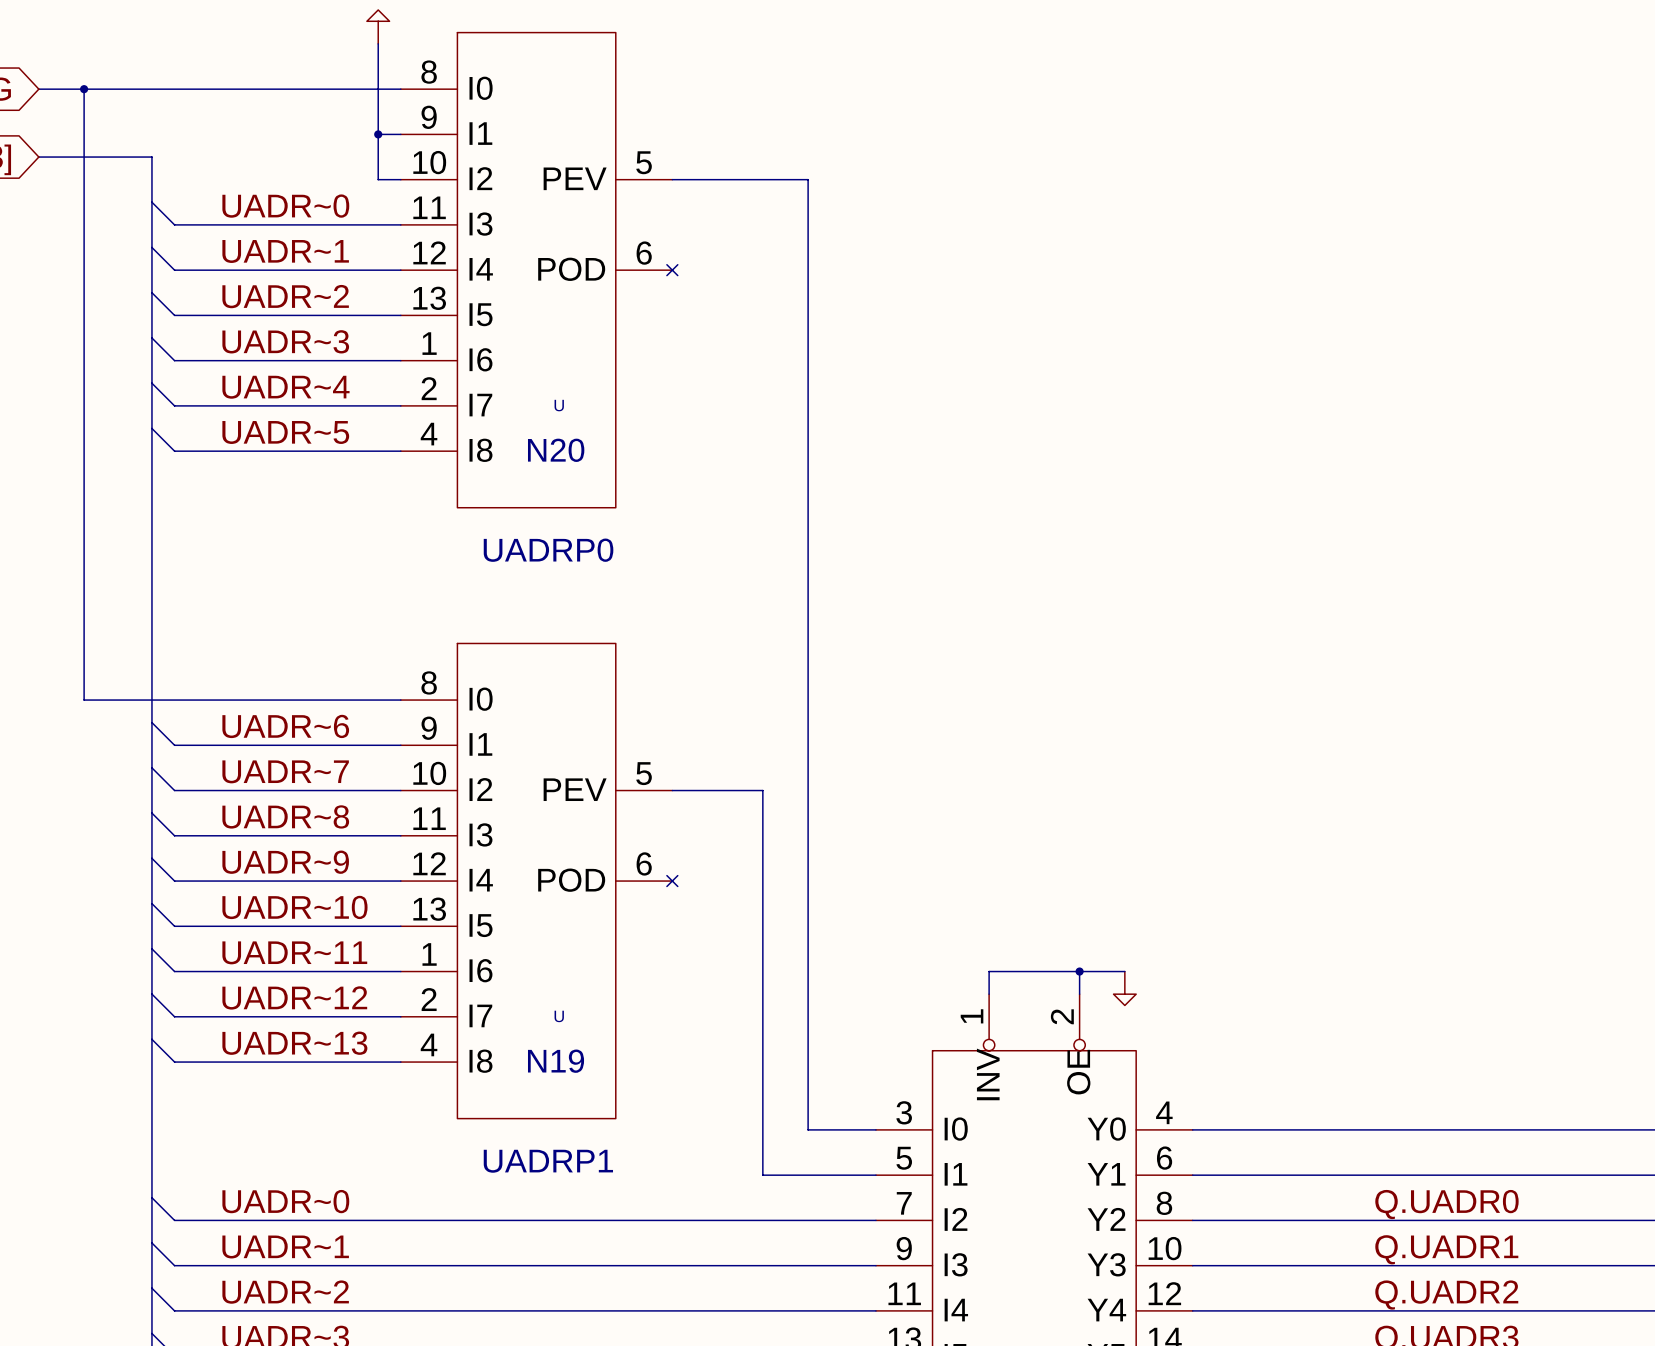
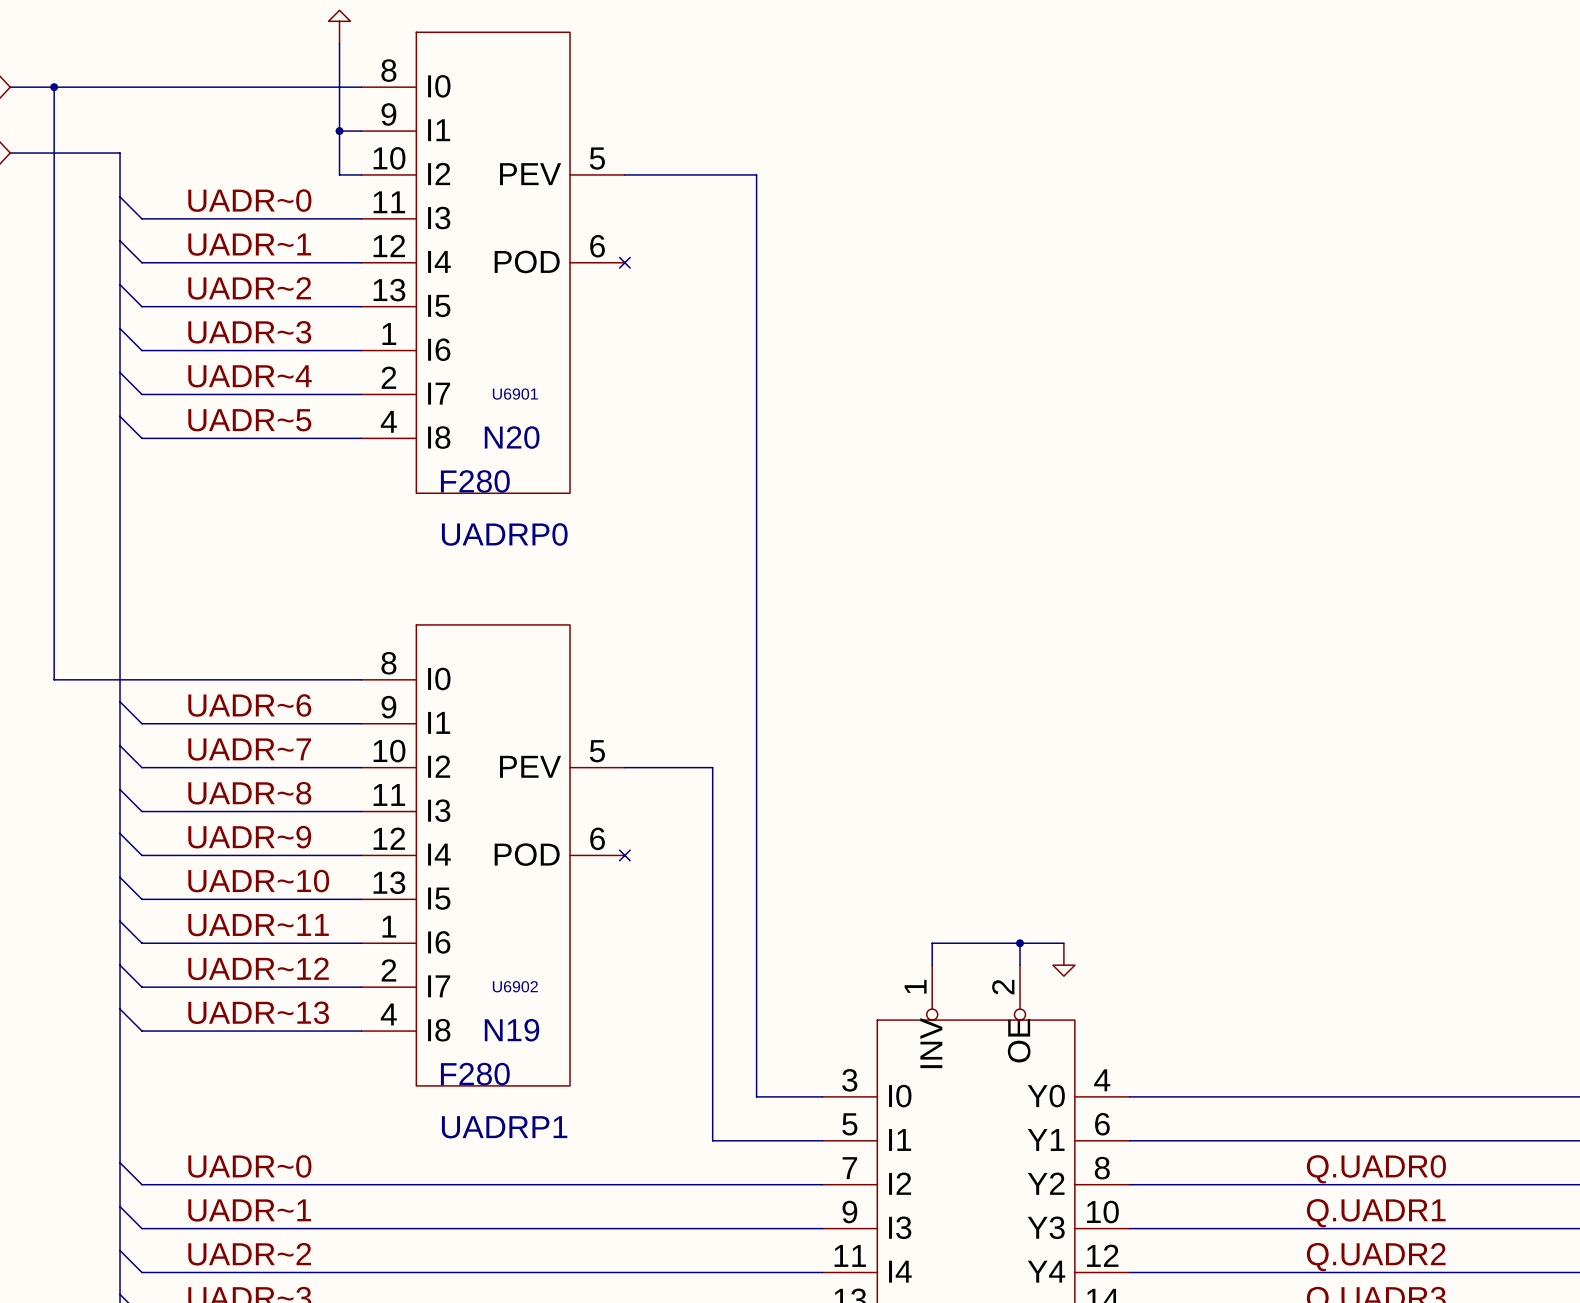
U name: U (559, 405) -> U6901 (515, 394)
U value: none -> F280 (475, 481)
U name: U (559, 1016) -> U6902 (515, 986)
U value: none -> F280 (475, 1074)

